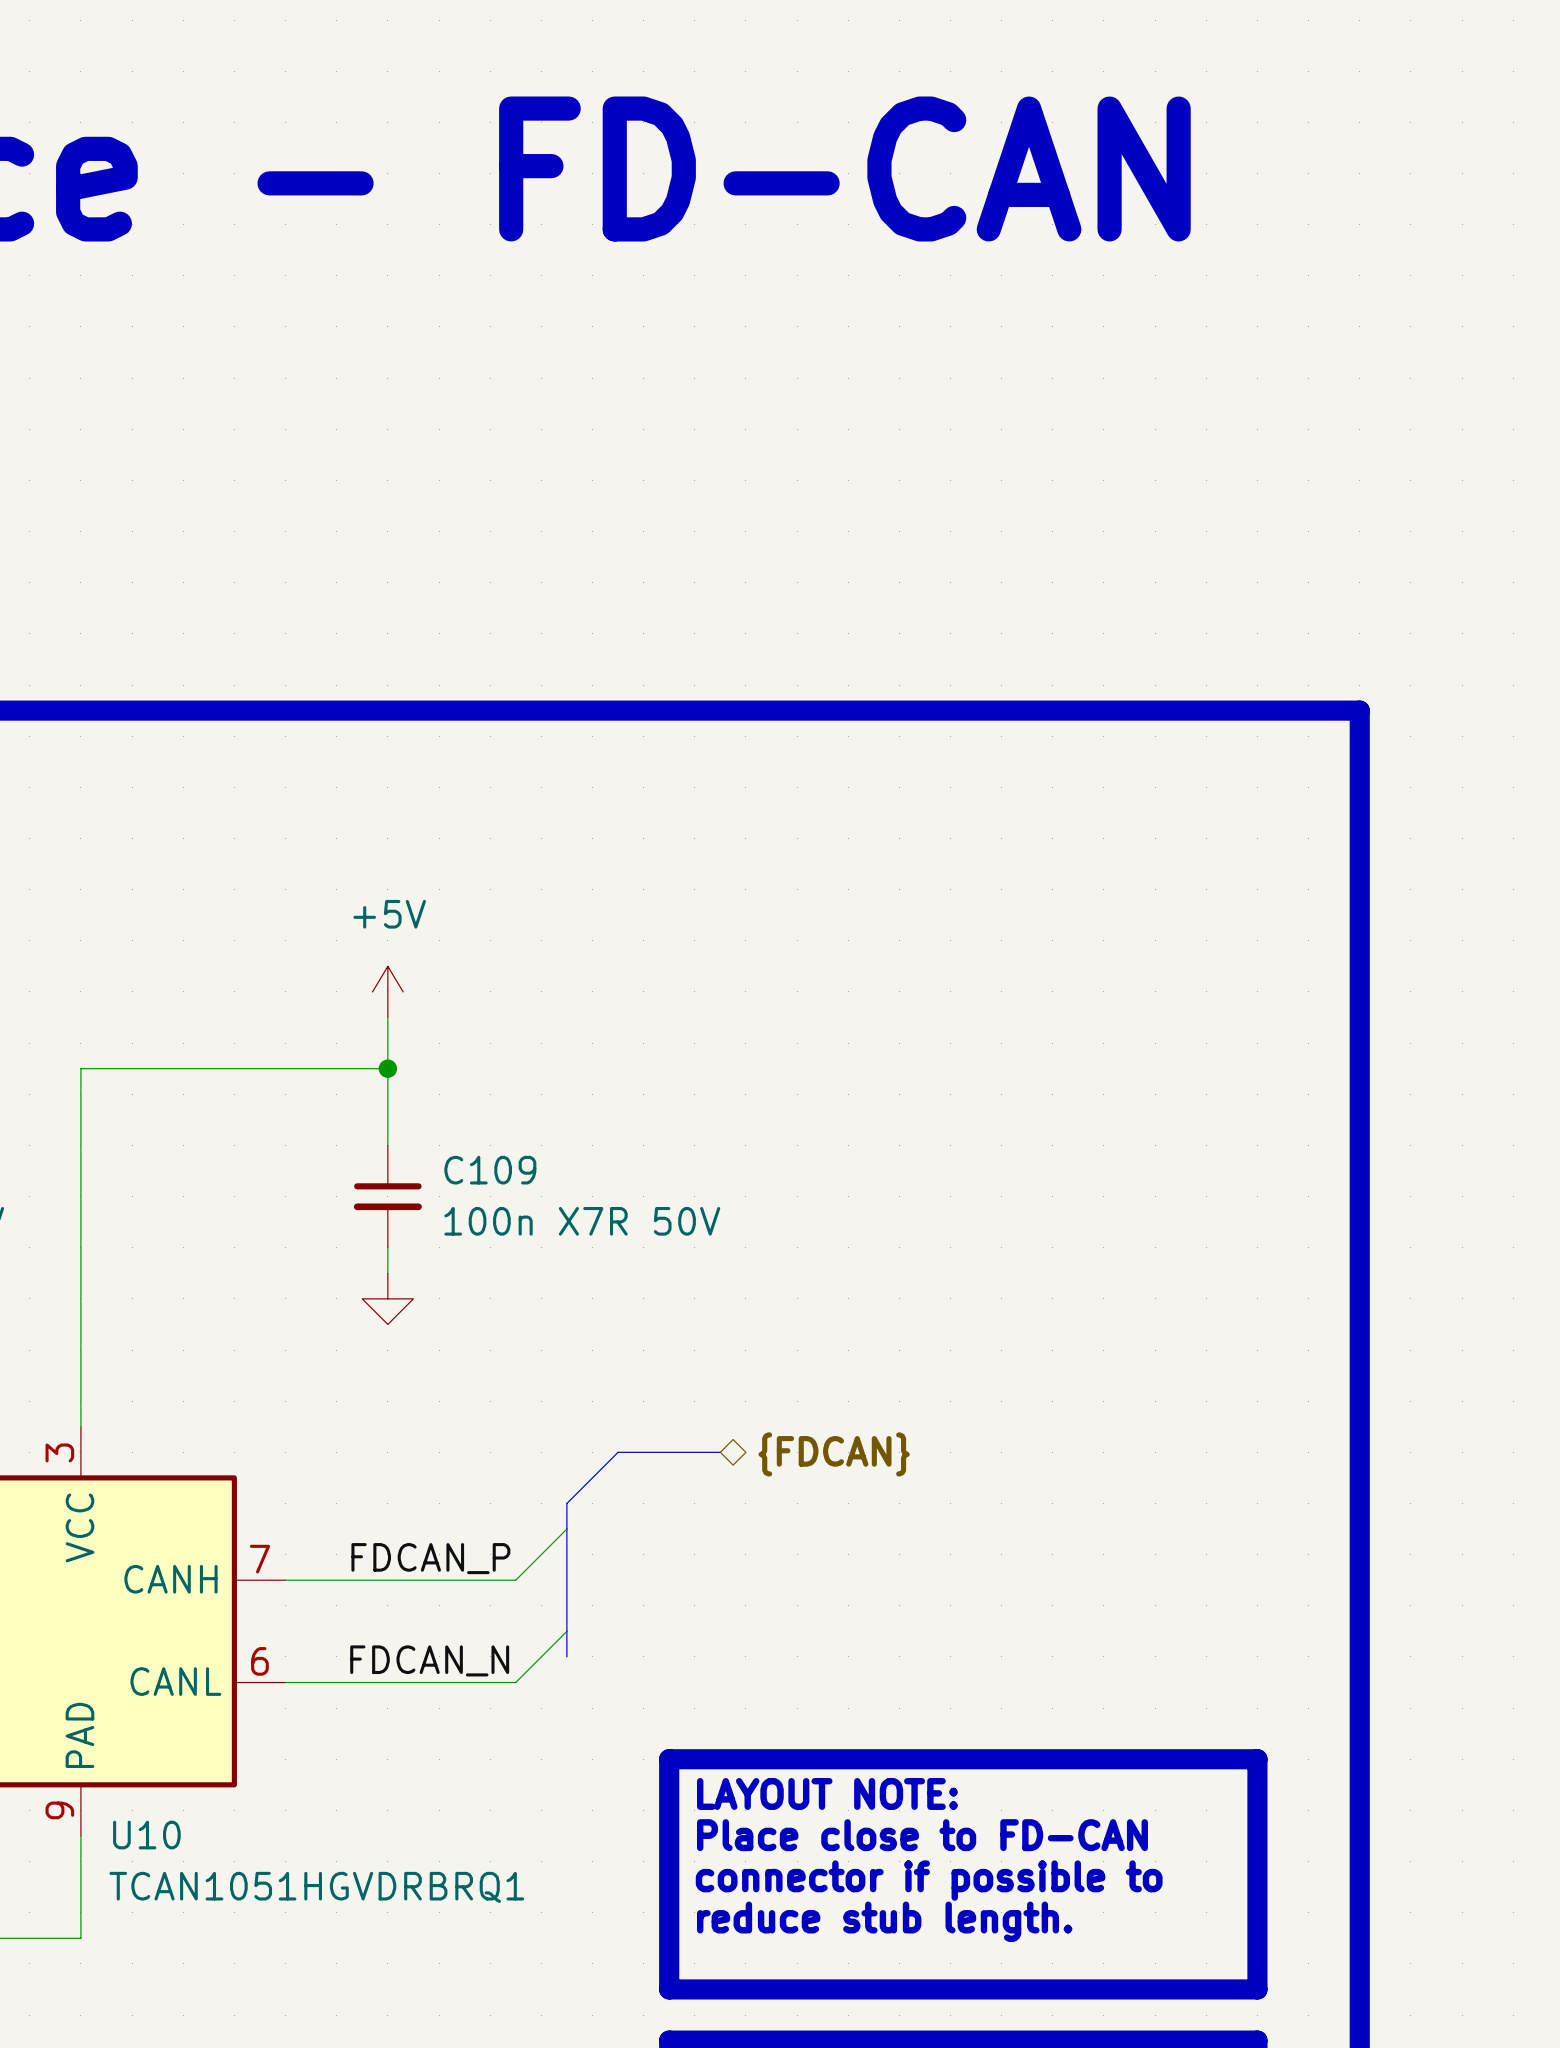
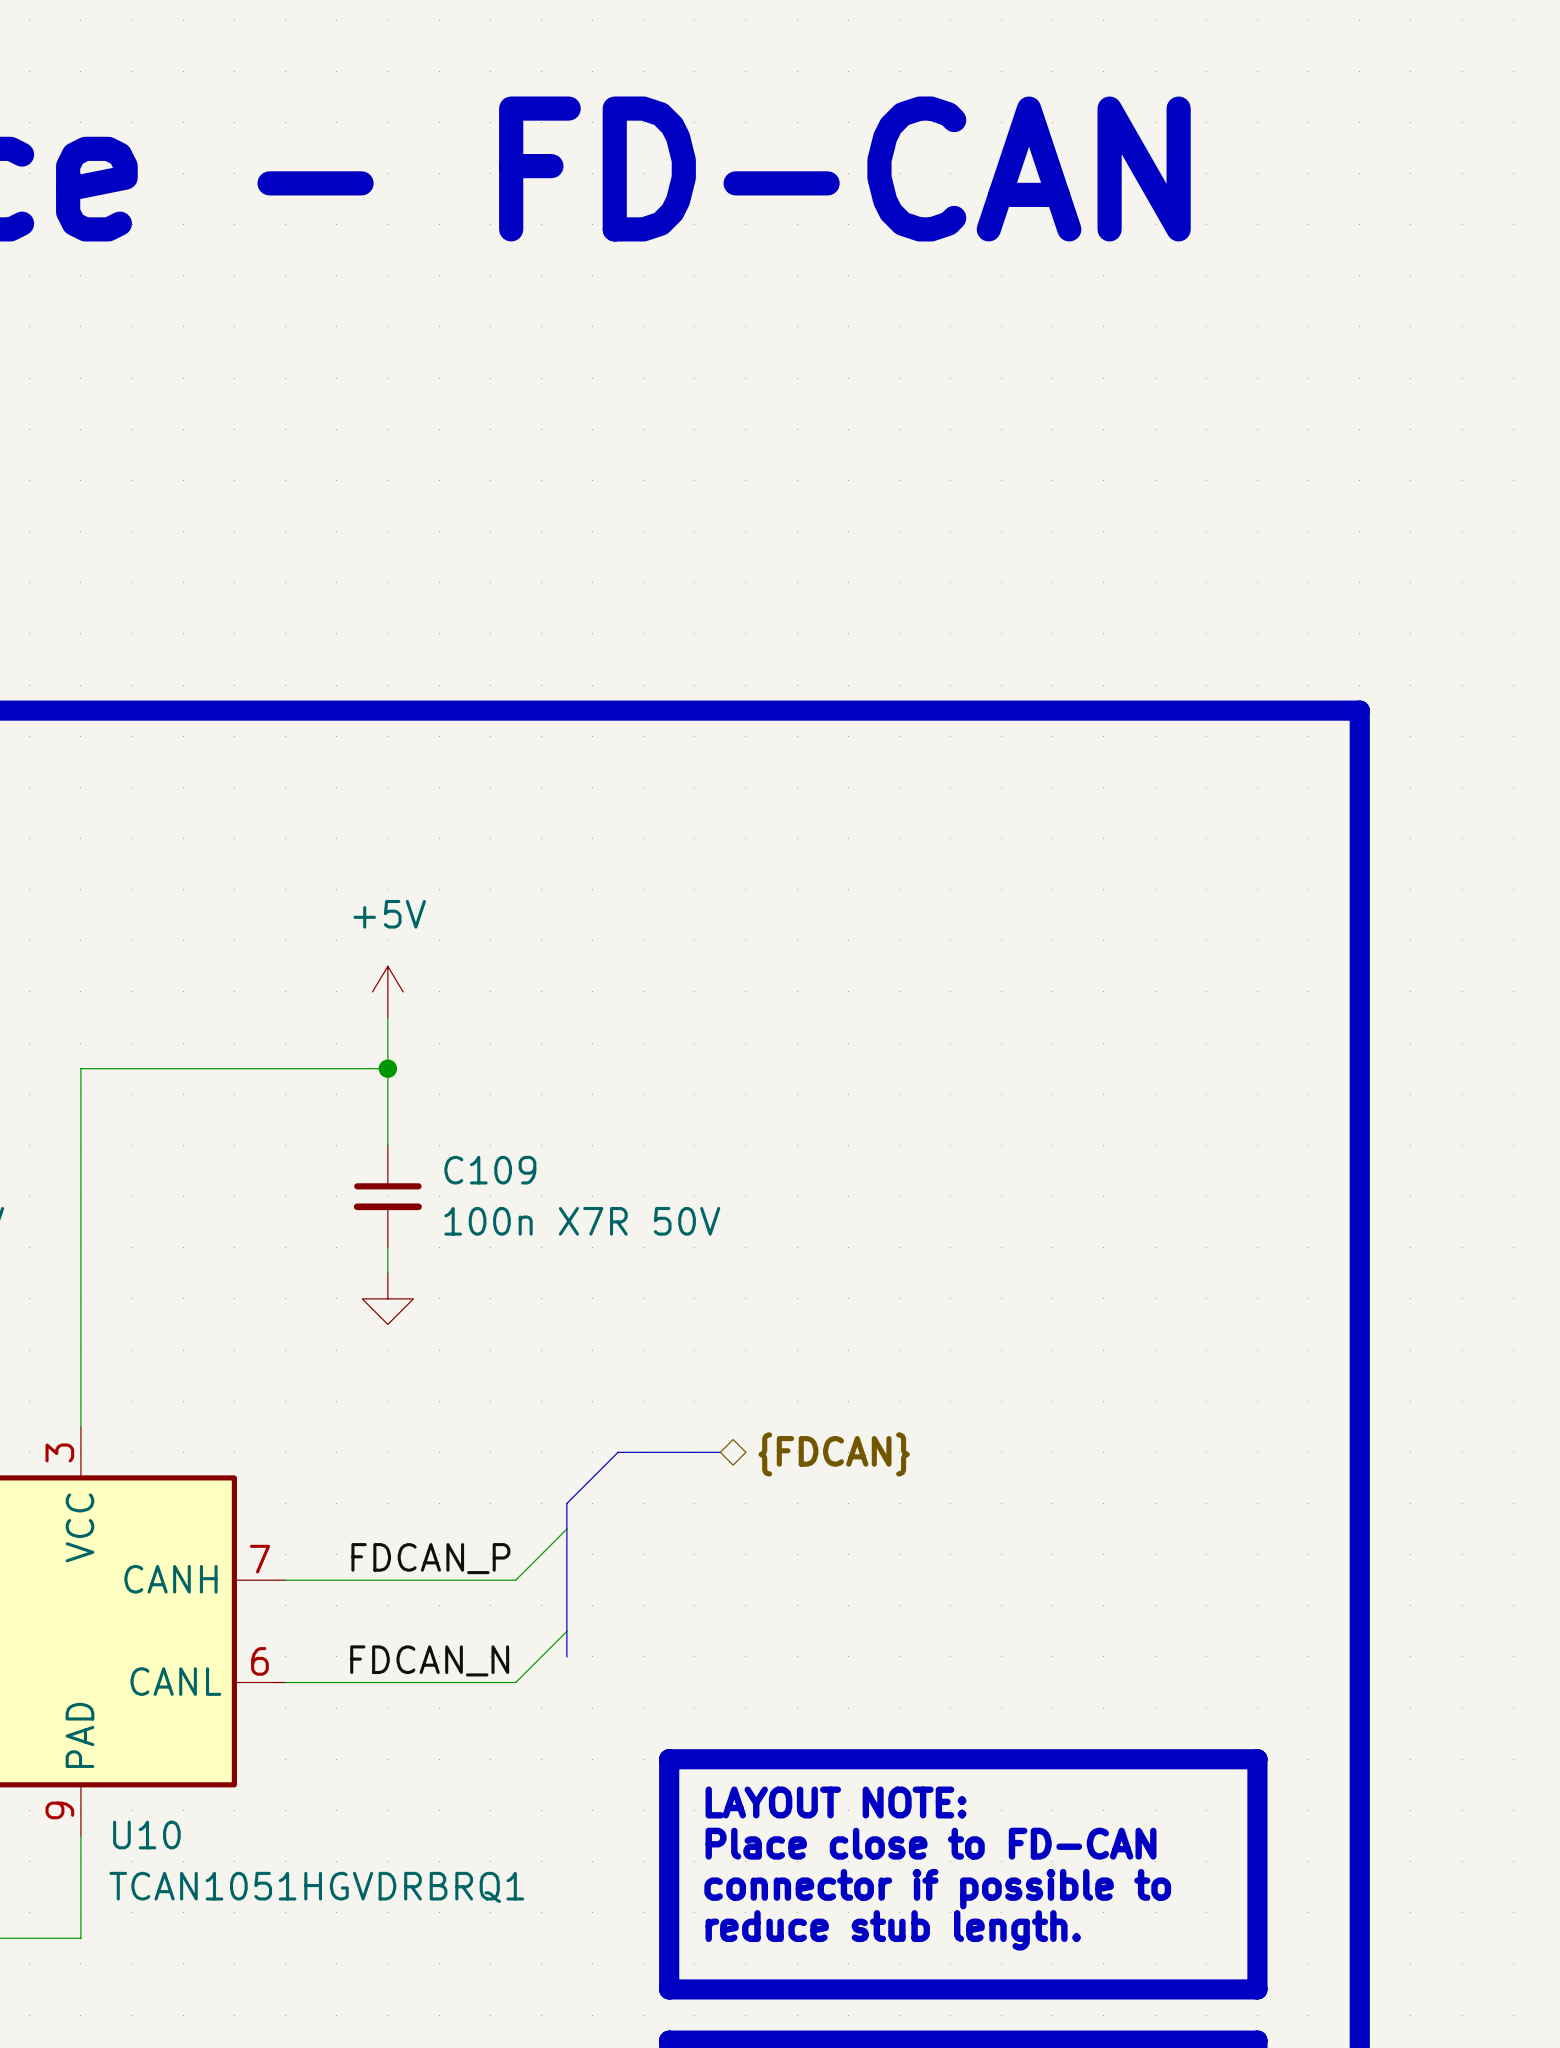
text position: LAYOUT NOTE: (827, 1793) -> LAYOUT NOTE: (836, 1802)
text position: Place close to FD-CAN (922, 1835) -> Place close to FD-CAN (931, 1843)
text position: connector if possible to (929, 1880) -> connector if possible to (937, 1889)
text position: reduce stub length. (884, 1921) -> reduce stub length. (893, 1930)

